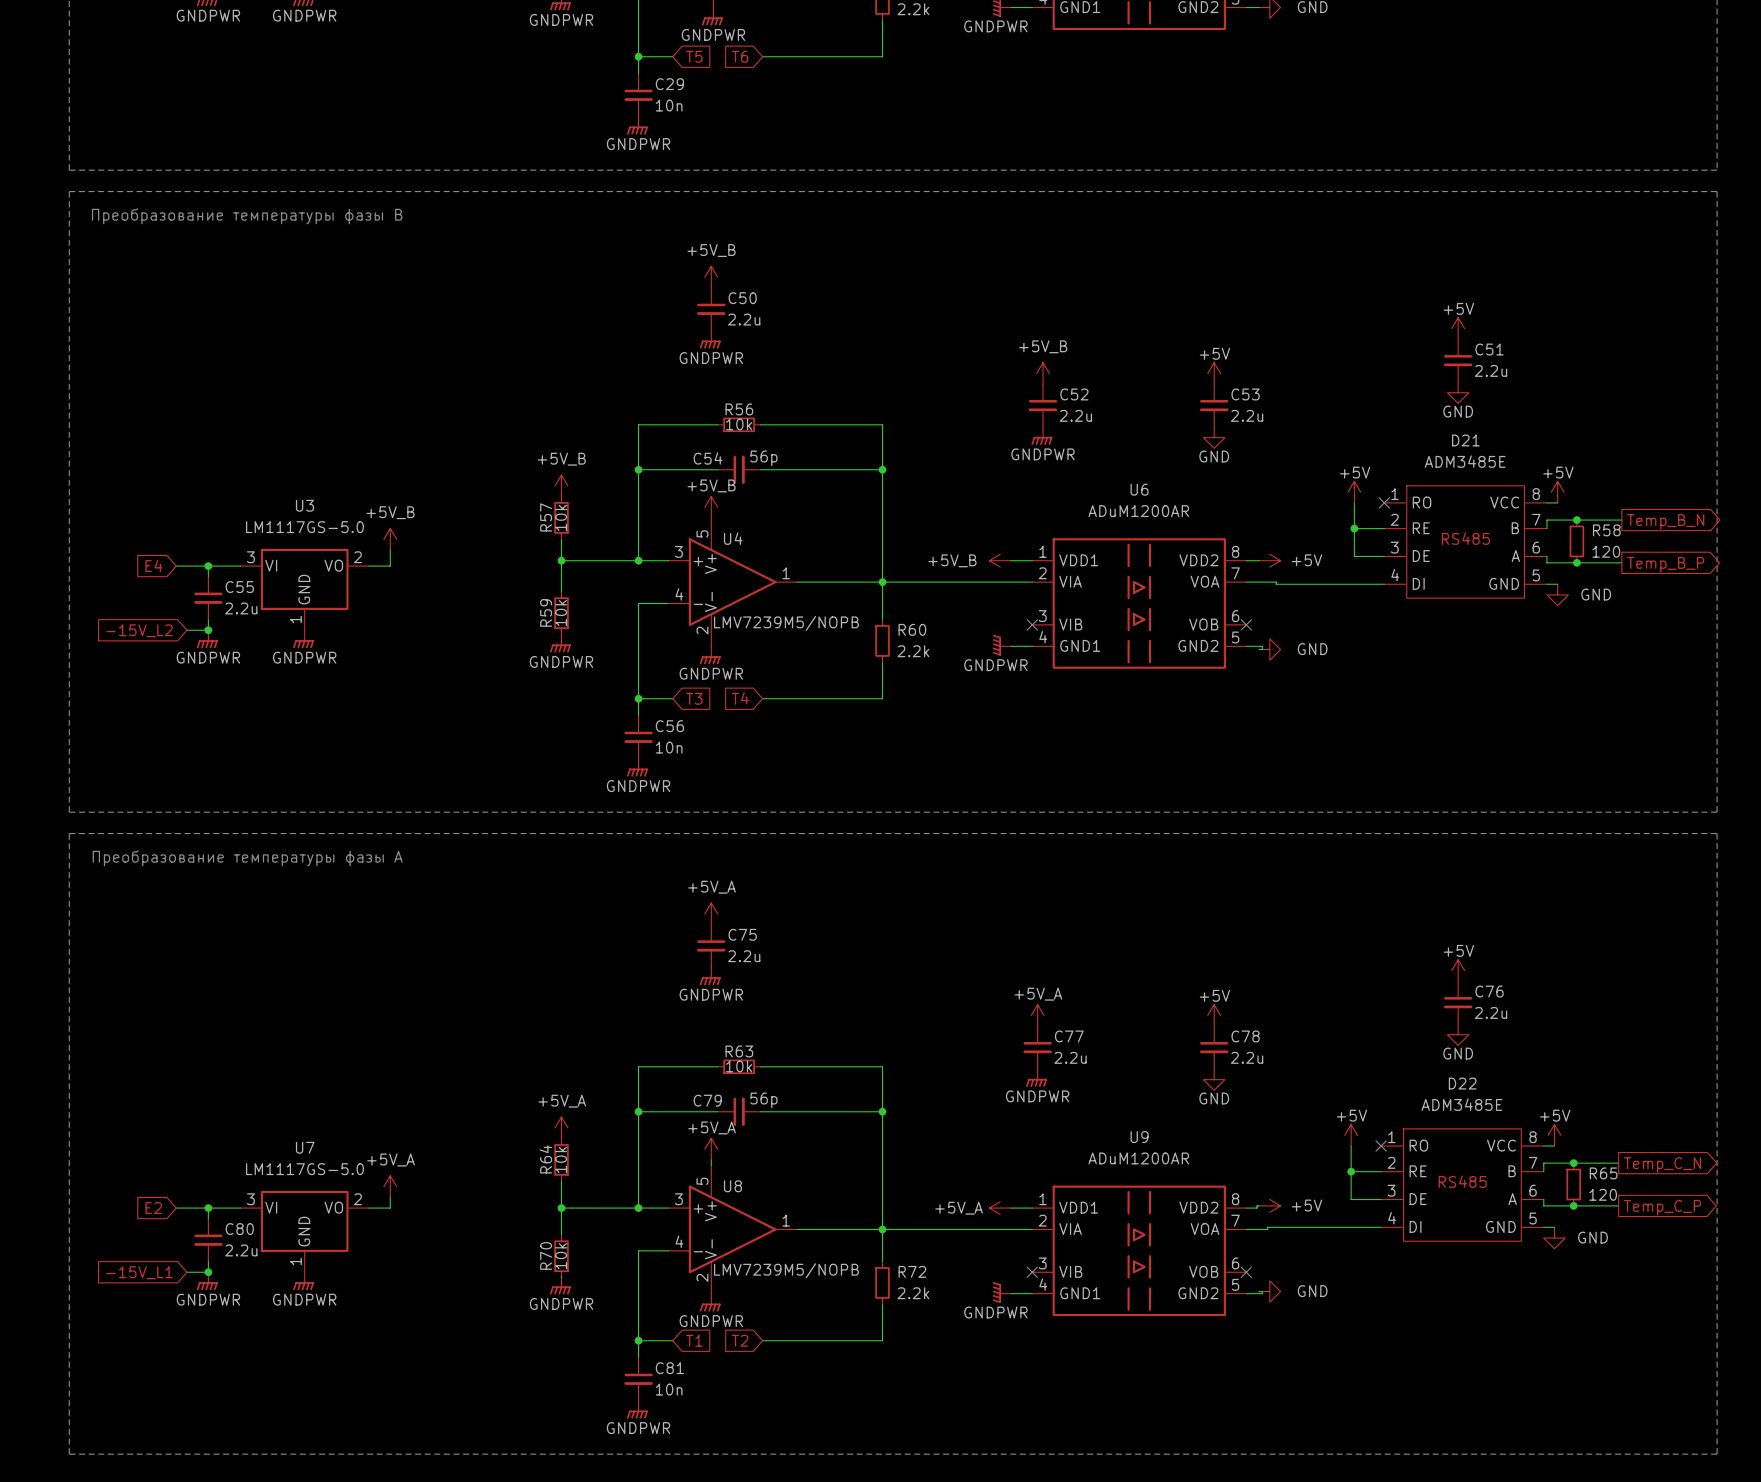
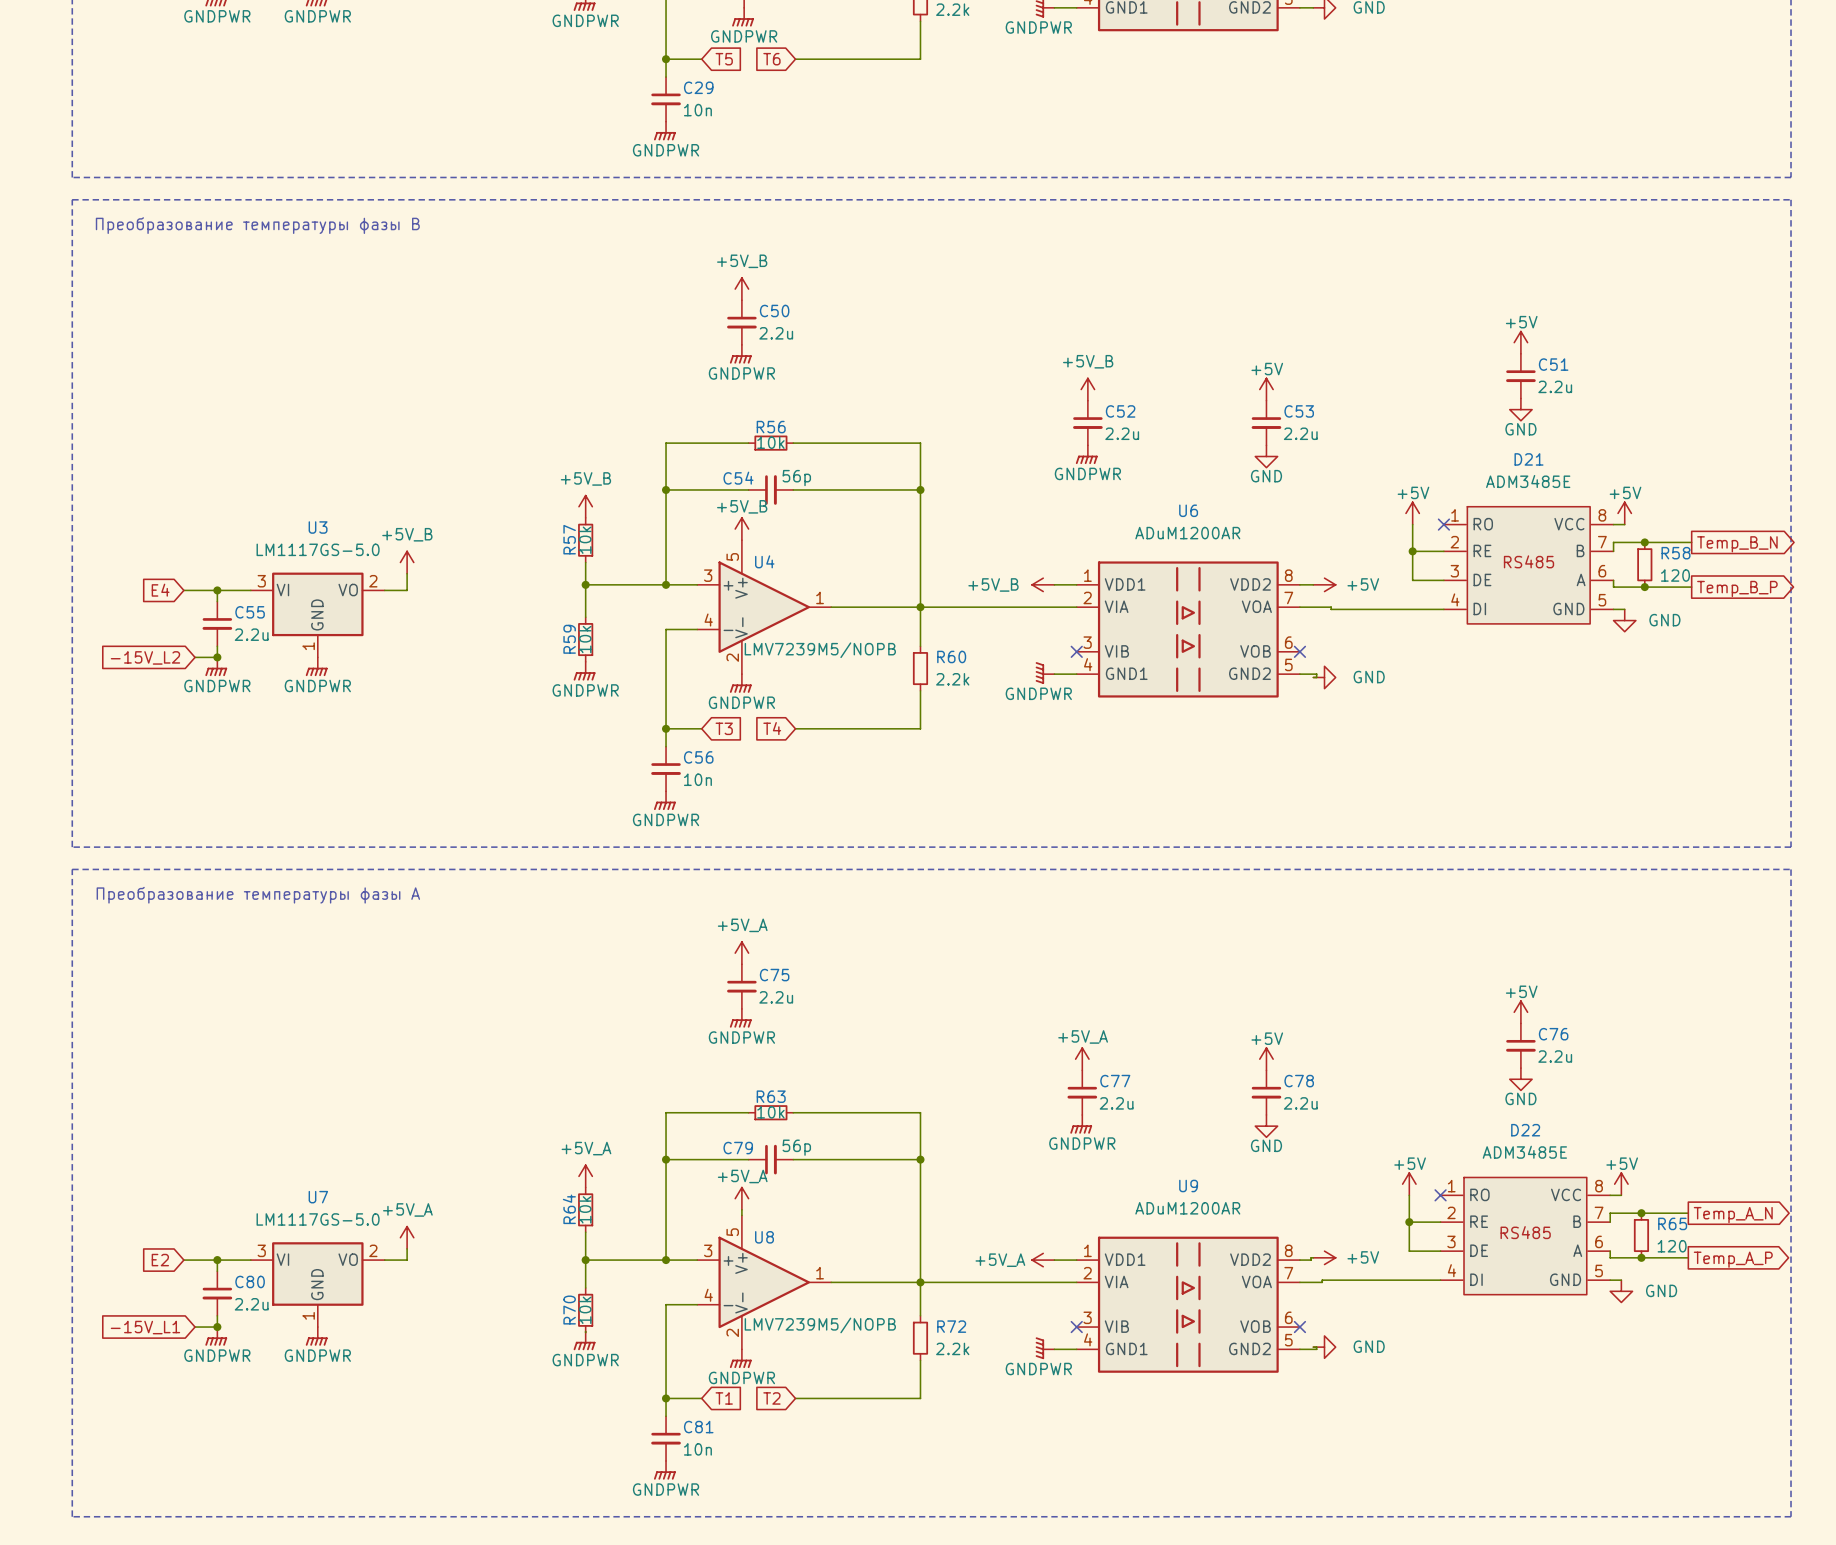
global label: Temp_C_N (1662, 1164) -> Temp_A_N (1733, 1215)
global label: Temp_C_P (1662, 1207) -> Temp_A_P (1733, 1259)

